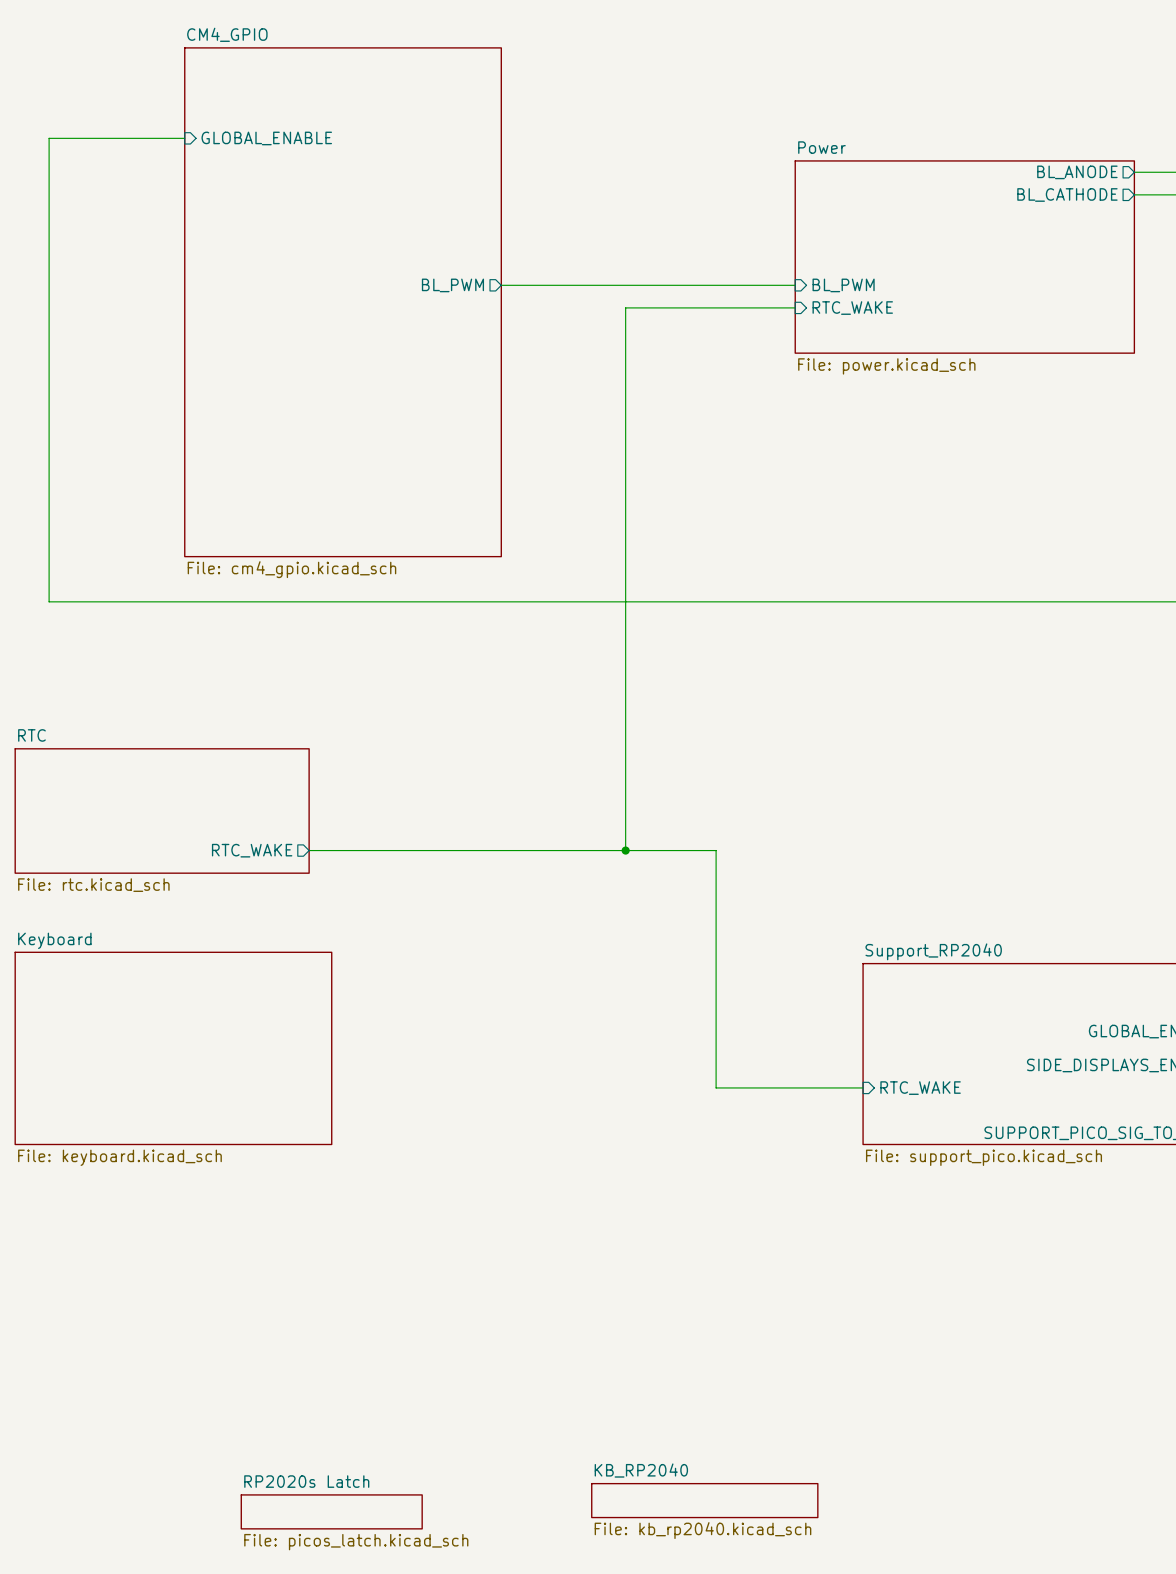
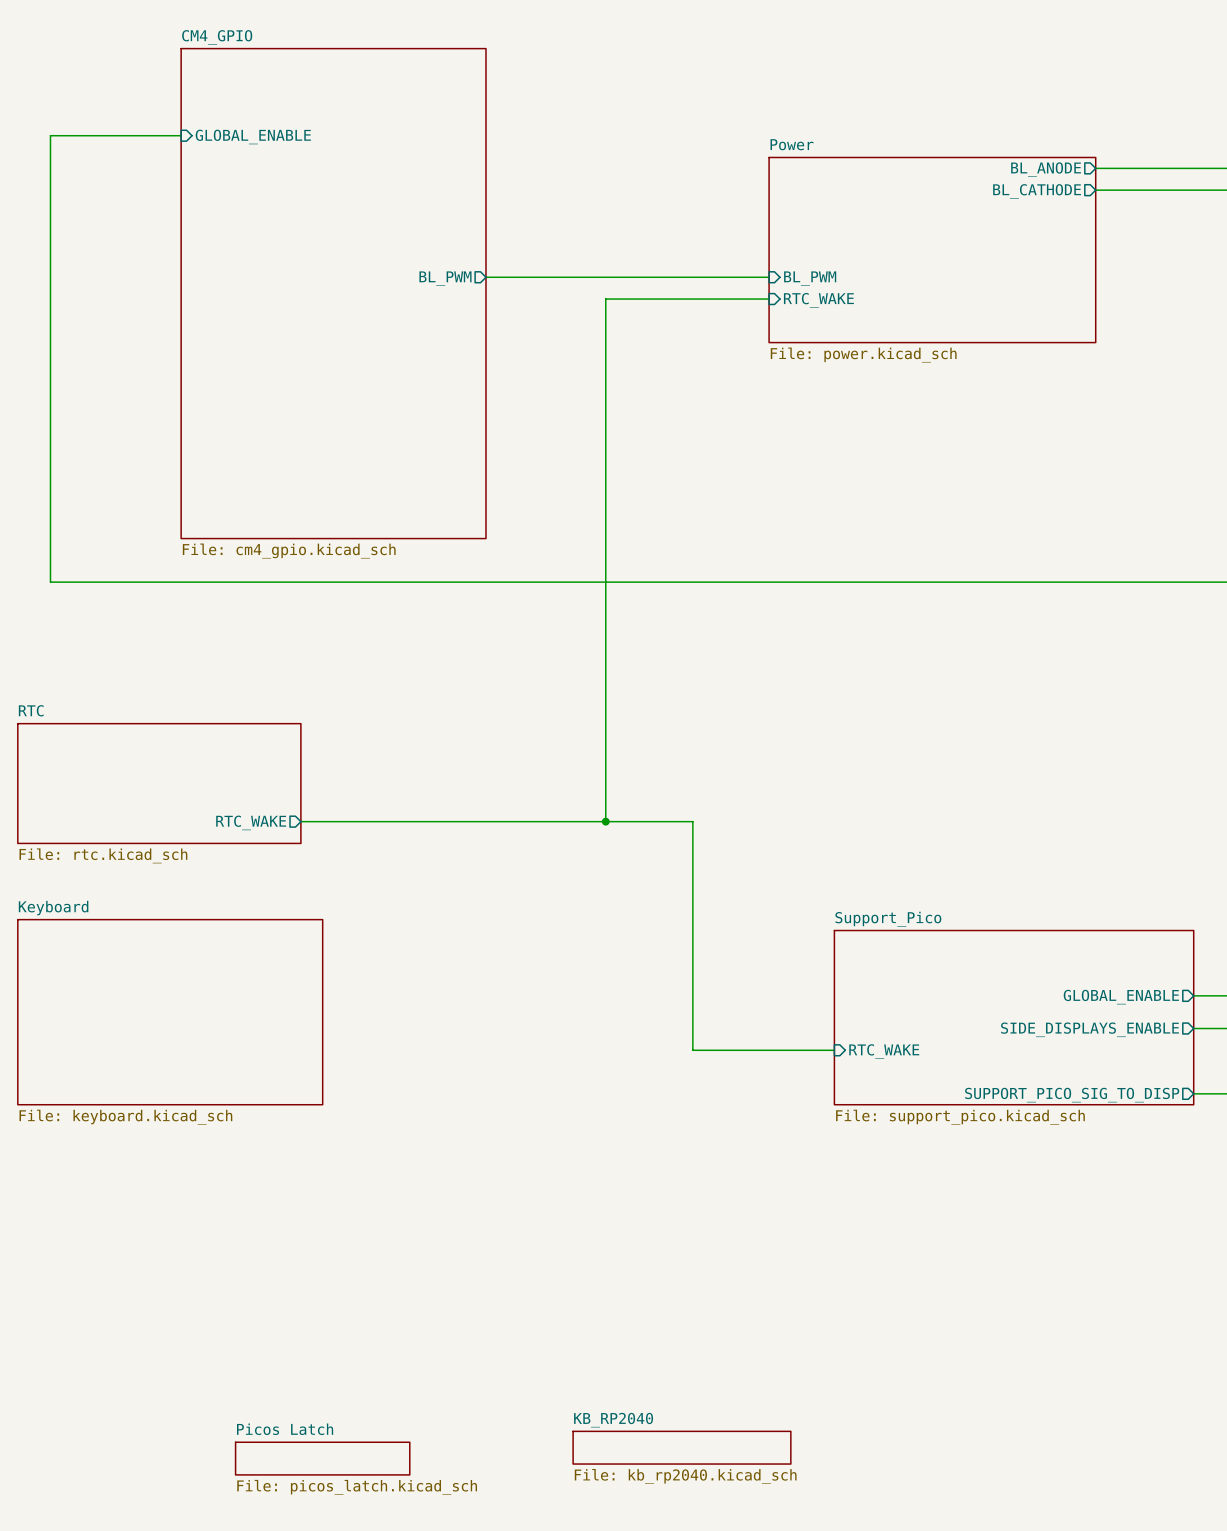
sheet Support_RP2040 name: Support_RP2040 (933, 951) -> Support_Pico (888, 919)
sheet RP2020s Latch name: RP2020s Latch (306, 1481) -> Picos Latch (285, 1429)

